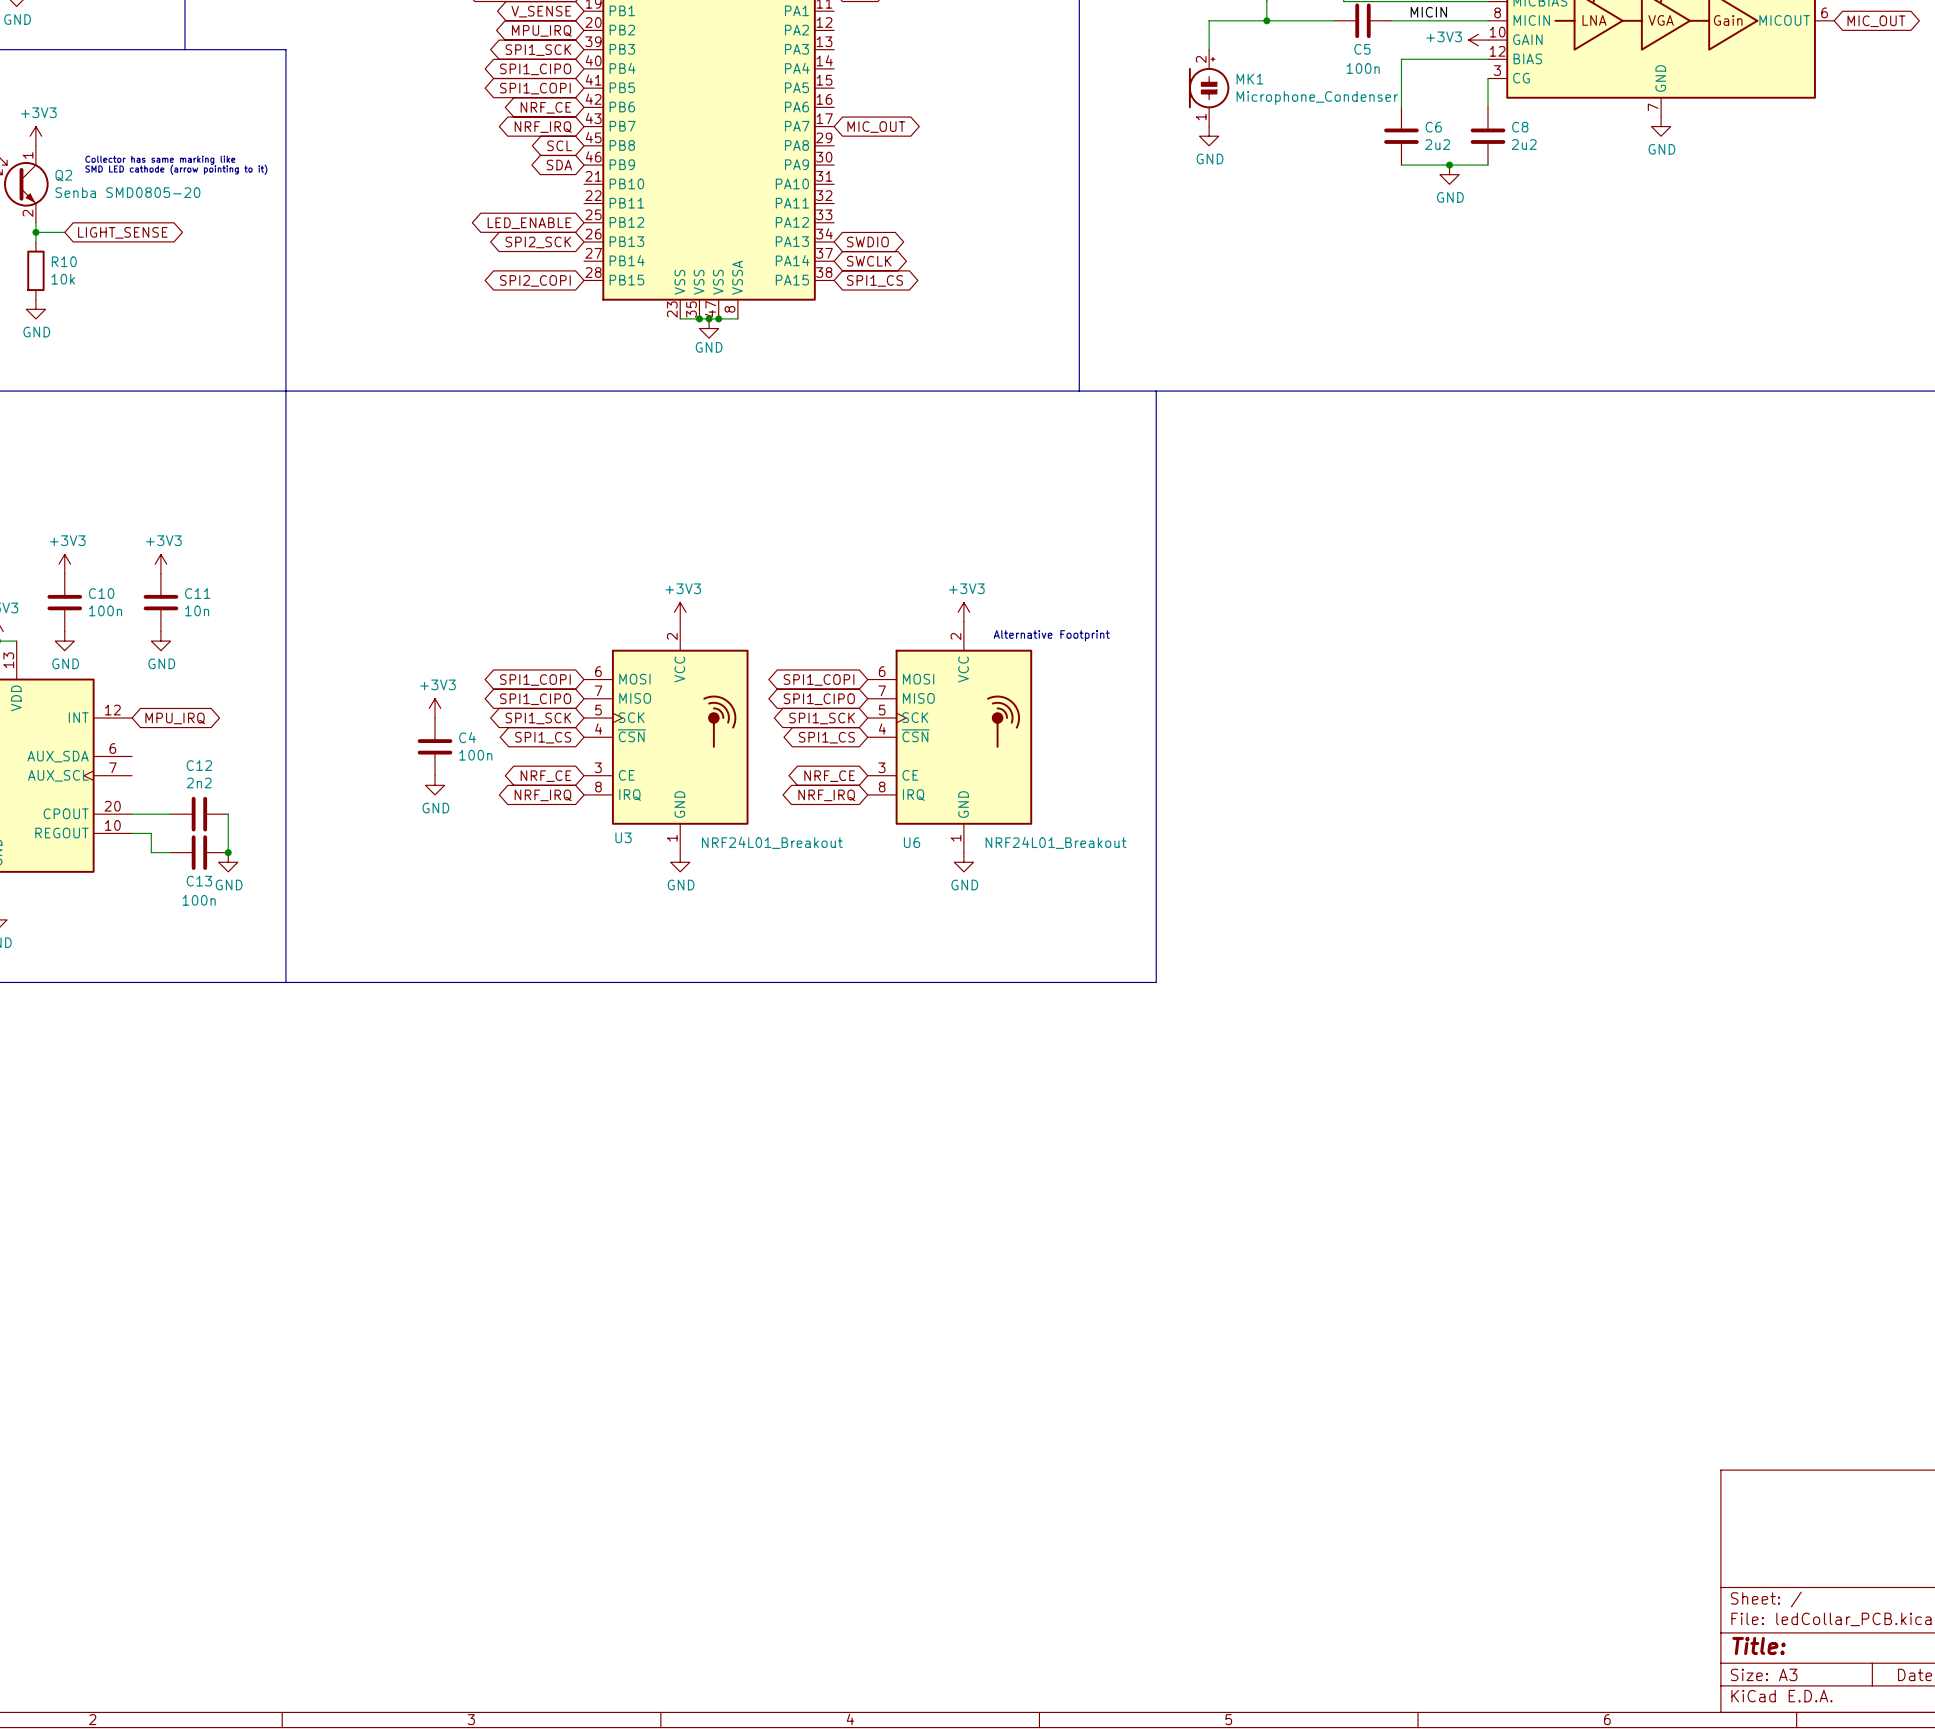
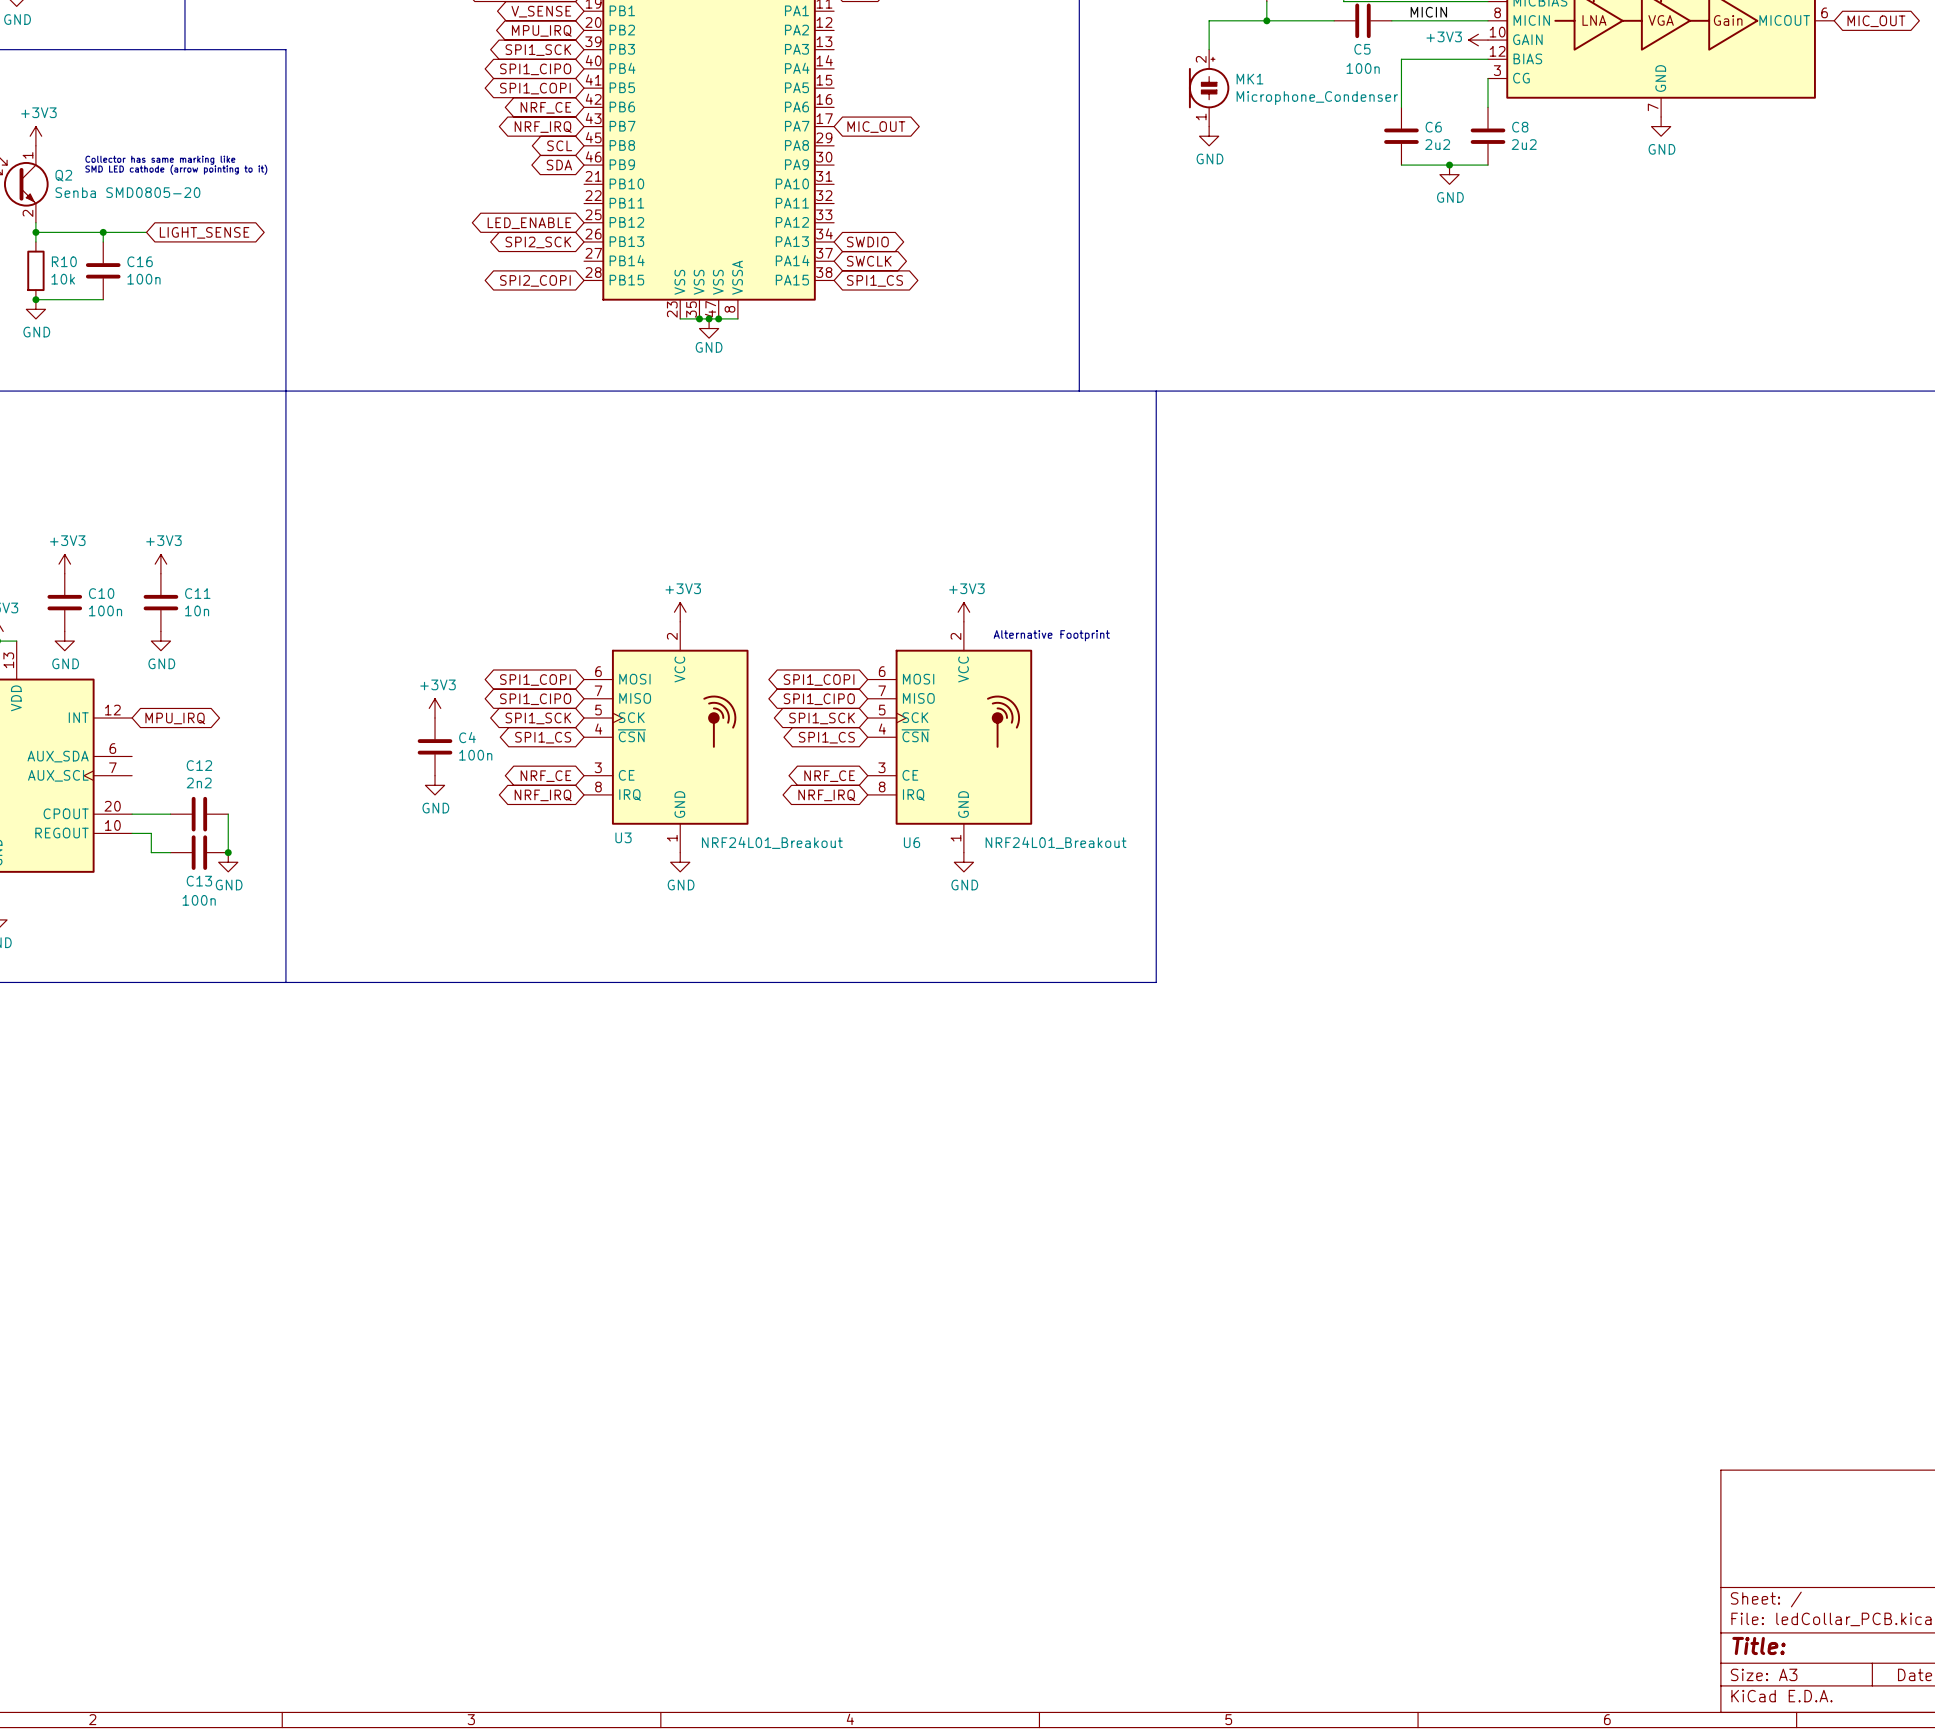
wire: none -> (64, 232) (146, 232)
wire: none -> (103, 232) (103, 241)
junction: none -> (103, 232)
global label position: LIGHT_SENSE (122, 232) -> LIGHT_SENSE (204, 232)
C16: none -> 100n (103, 270)
wire: none -> (35, 299) (103, 299)
junction: none -> (35, 299)

